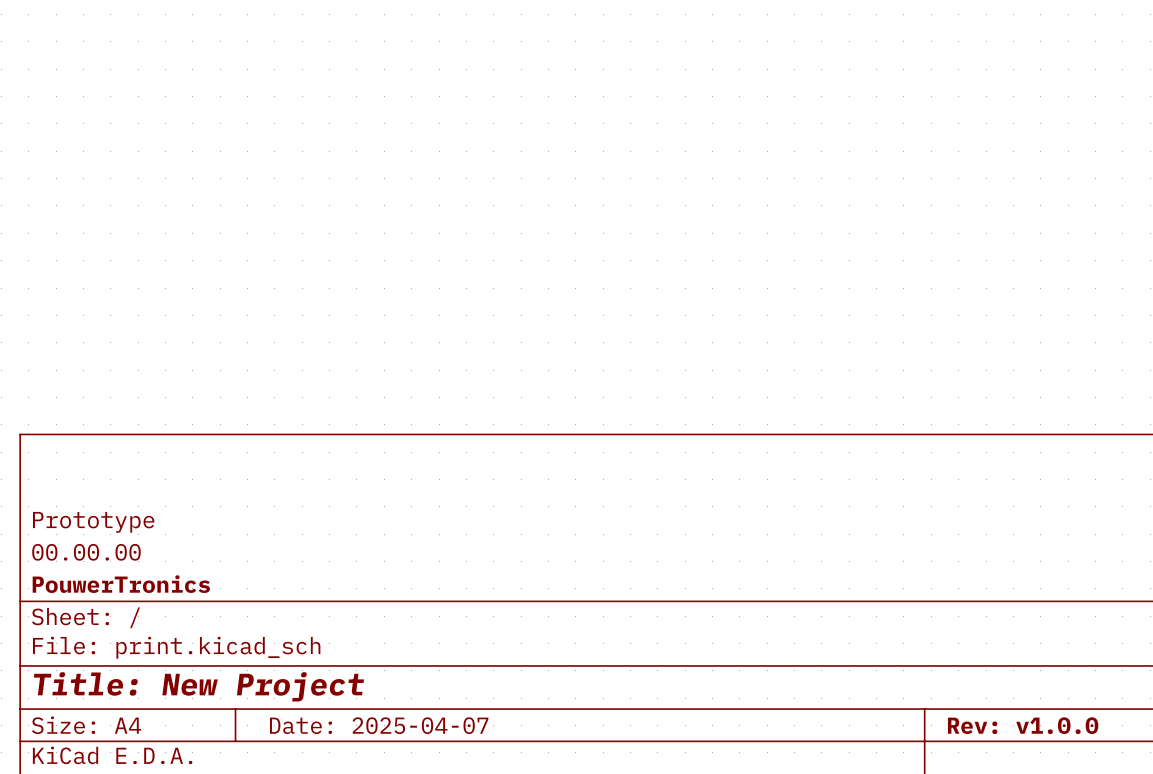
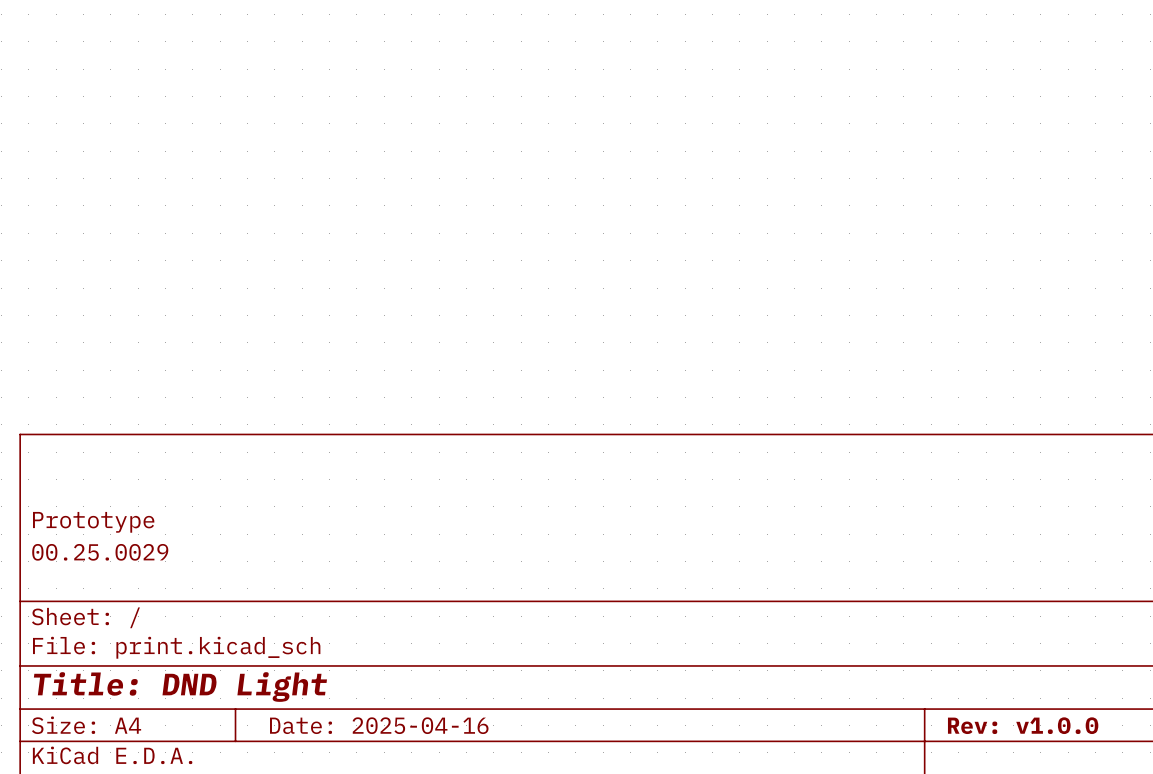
title block: 00.00.00 (86, 552) -> 00.25.0029 (100, 552)
title block: PouwerTronics (121, 584) -> none
title block: Title: New Project (198, 686) -> Title: DND Light (180, 687)
title block: Date: 2025-04-07 (379, 725) -> Date: 2025-04-16 (379, 725)

